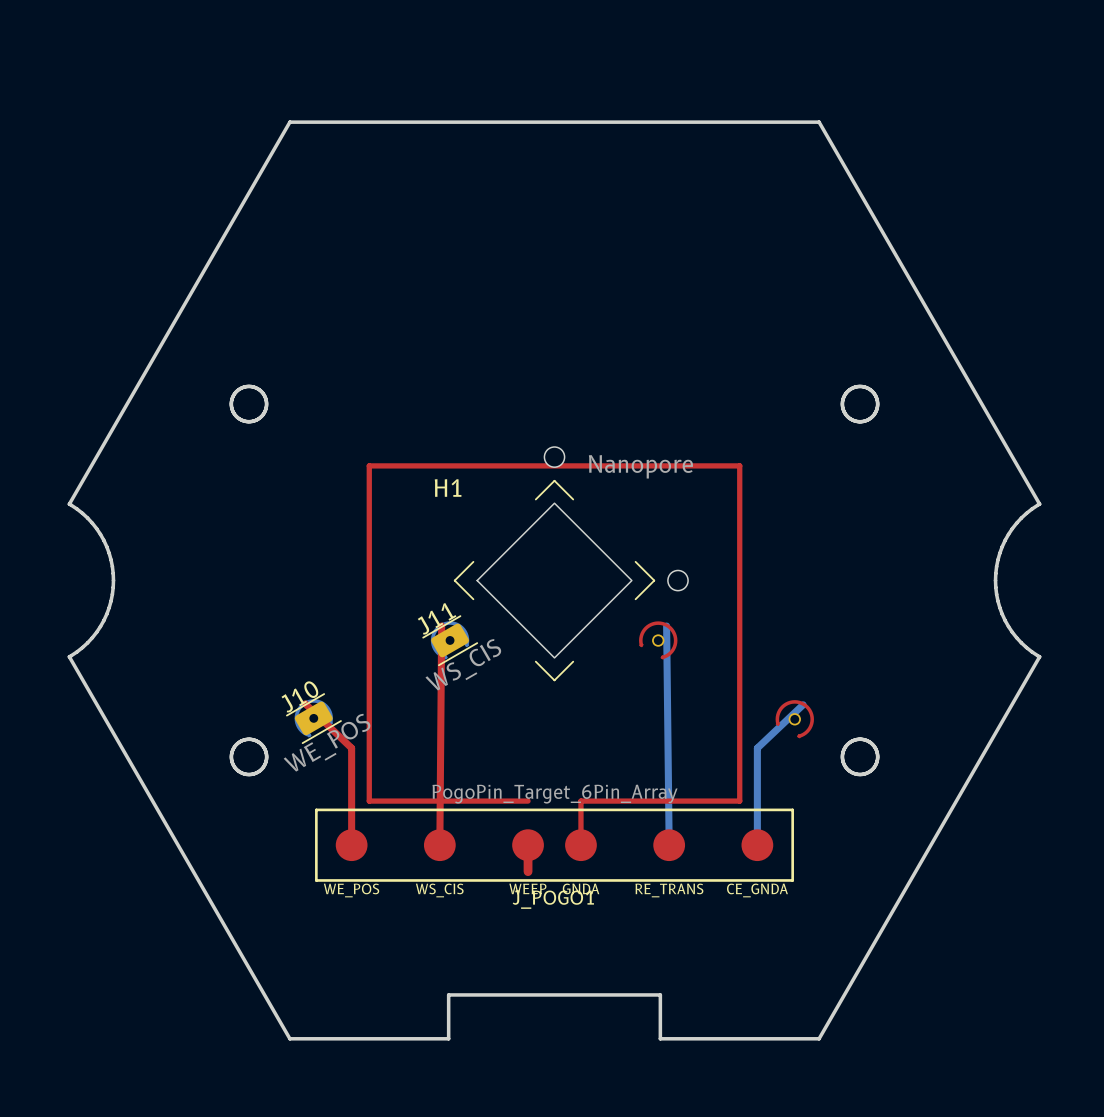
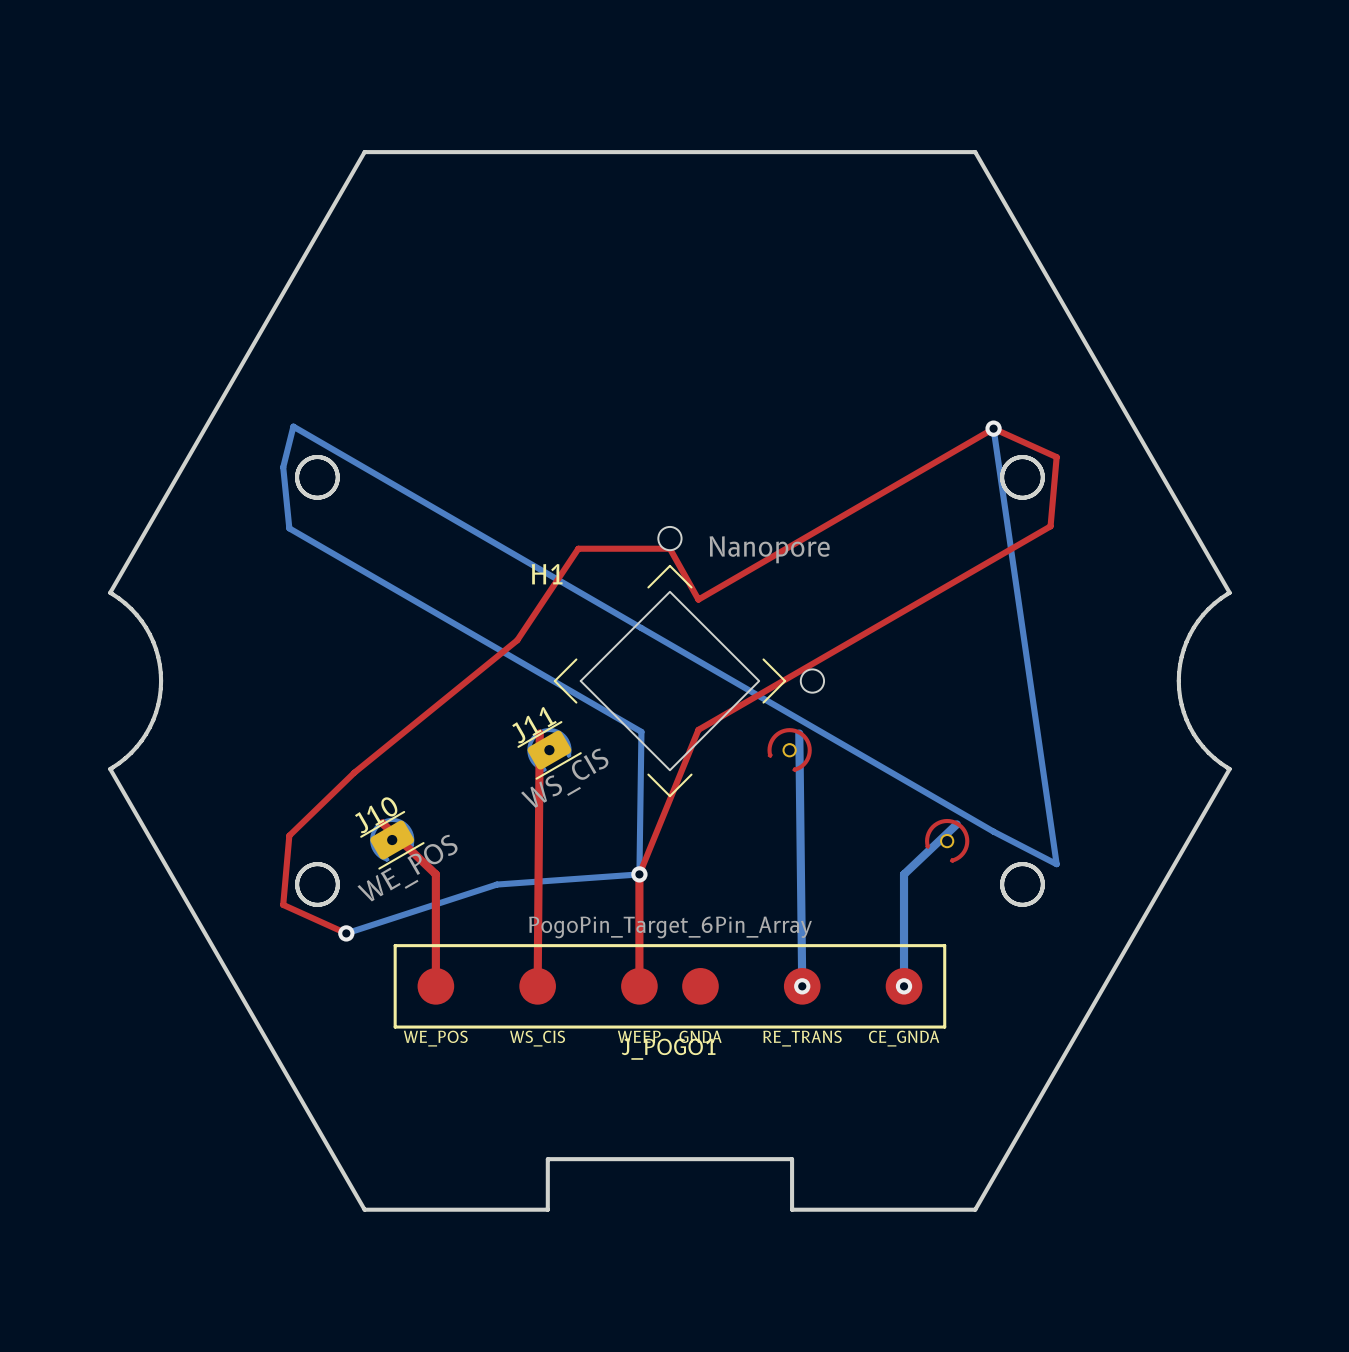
bottom track: none -> (993, 428) (1056, 864) (993, 831) (293, 426) (283, 467) (289, 528) (641, 731) (639, 874) (496, 884) (346, 933)
via: none -> (993, 428)
top track: (475, 465) (369, 465) (369, 801) (528, 801) -> (578, 548) (517, 640) (354, 772) (289, 835) (283, 904) (346, 933)
top track: (554, 465) (739, 465) (739, 801) (580, 801) (580, 845) -> (669, 548) (698, 599) (993, 428) (1056, 457) (1050, 526) (698, 729) (639, 874) (639, 986)
via: none -> (639, 874)
via: none -> (346, 933)
top track: (528, 845) (528, 871) -> none
via: none -> (802, 986)
via: none -> (904, 986)

